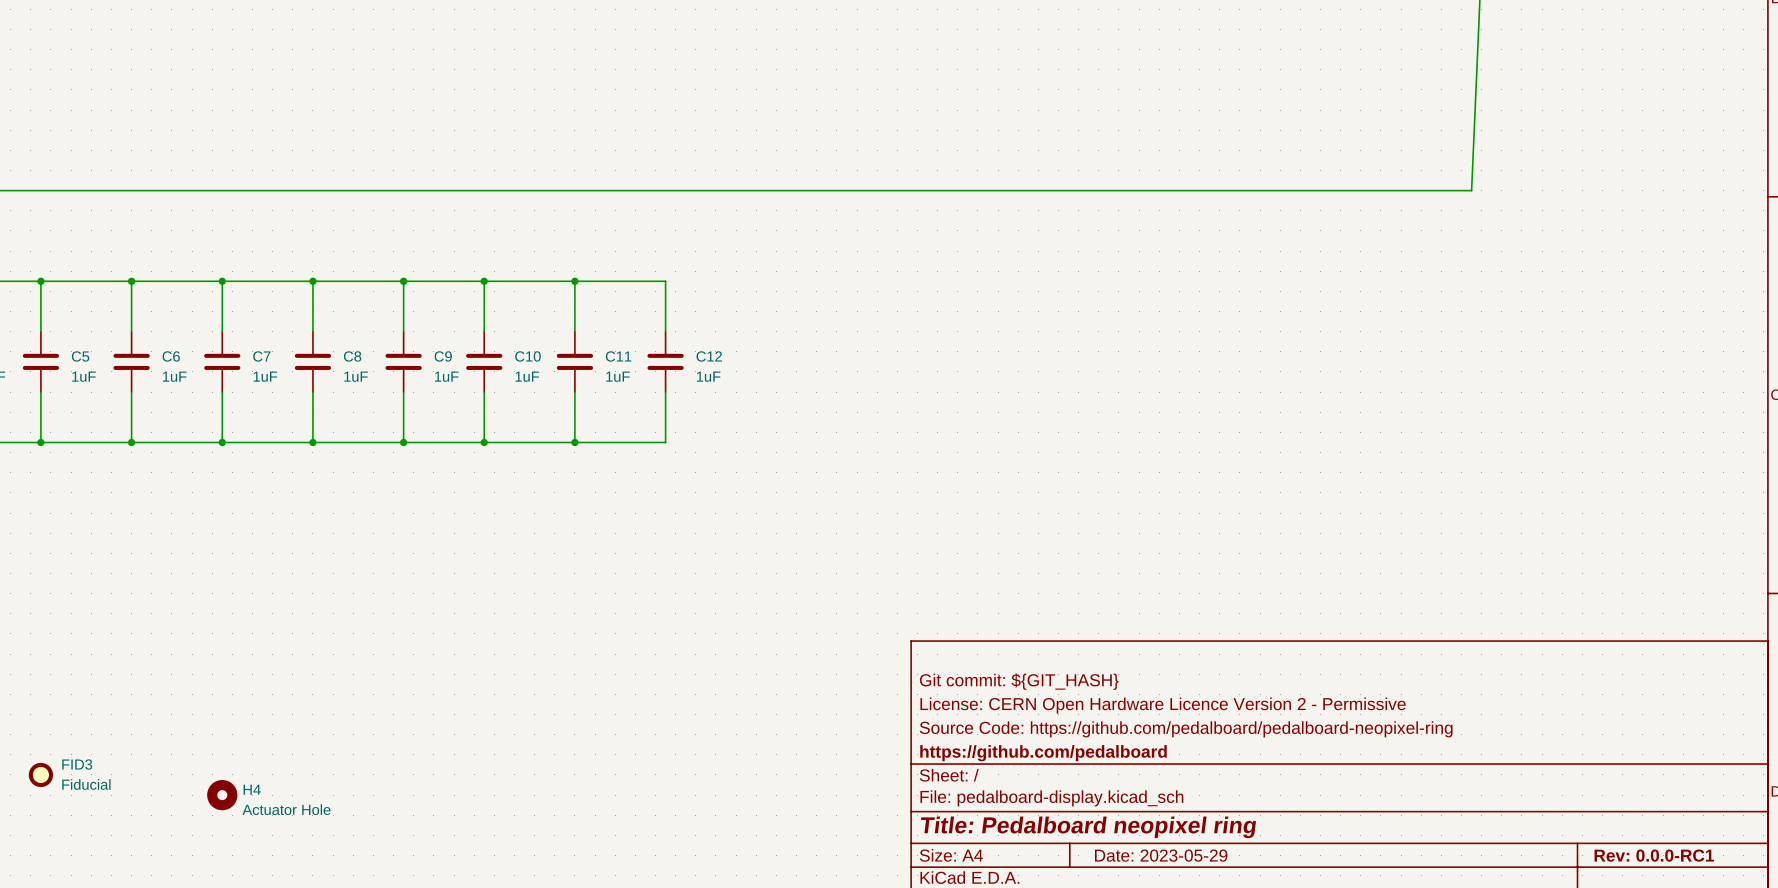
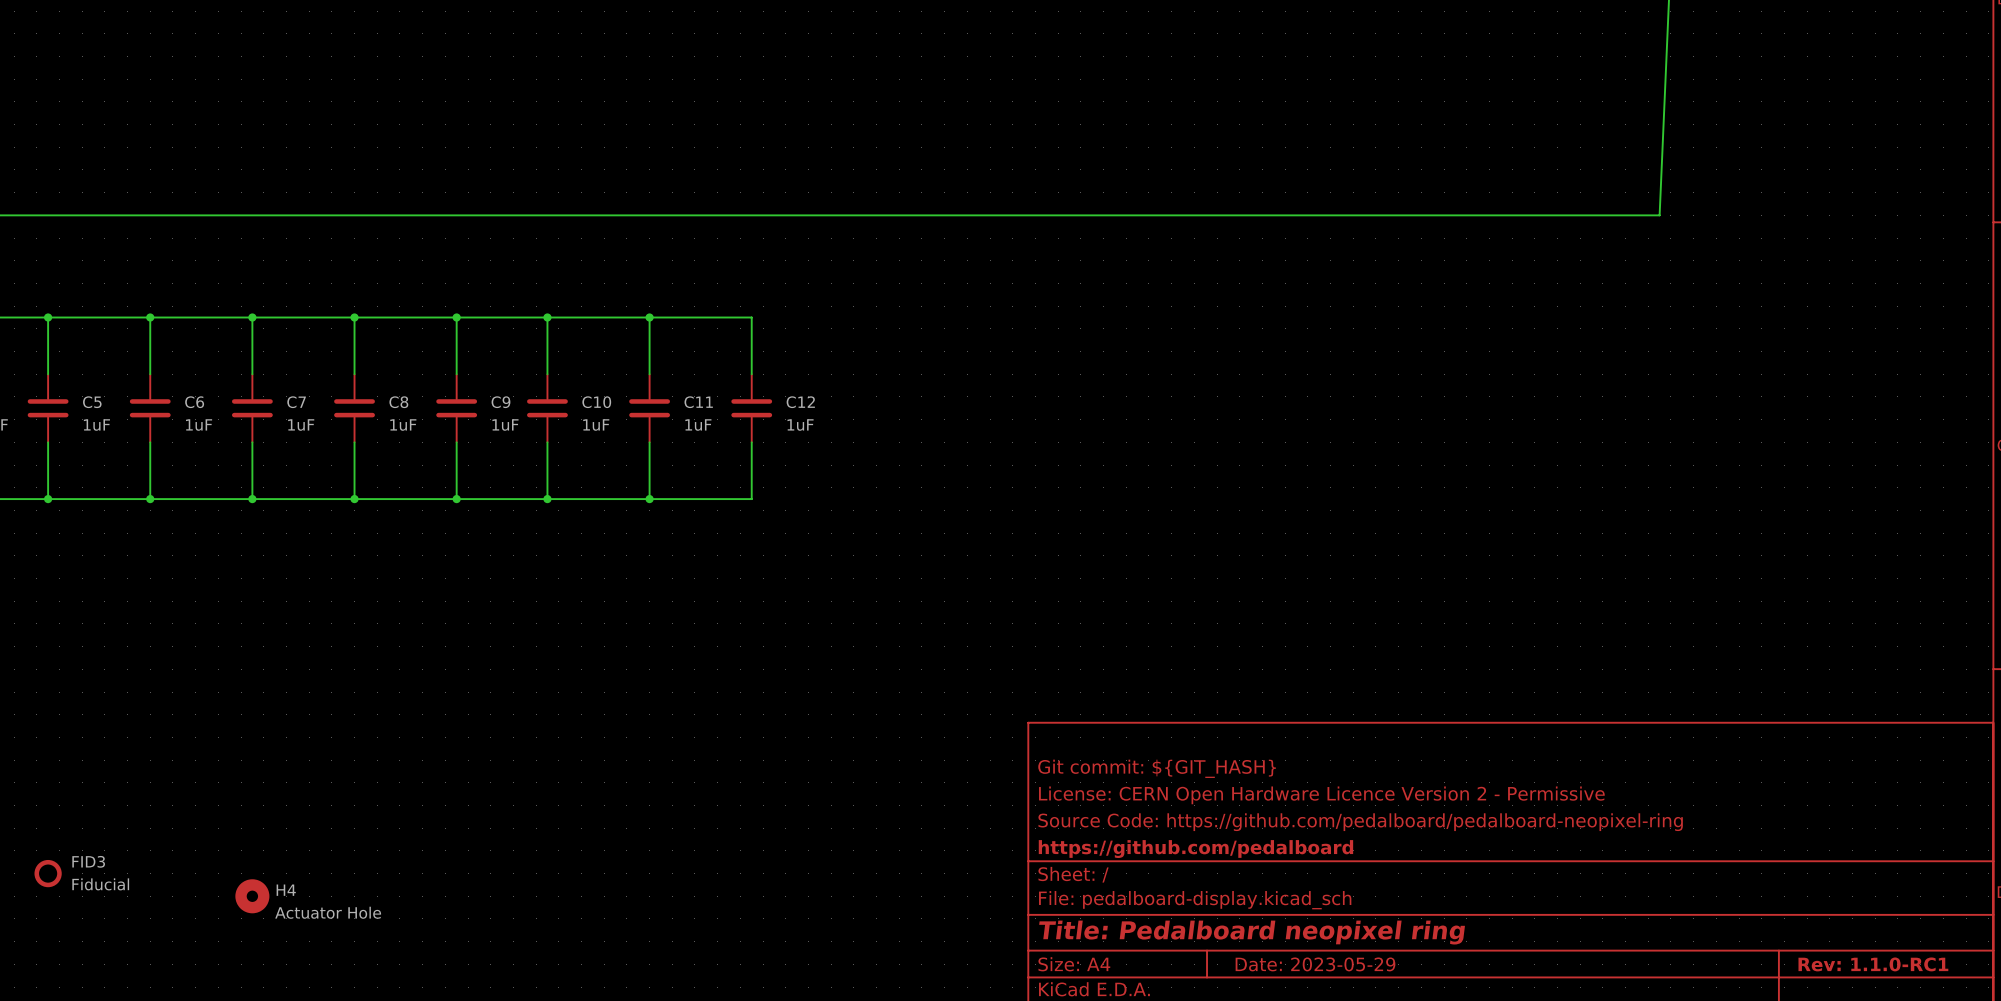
title block: Rev: 0.0.0-RC1 (1654, 855) -> Rev: 1.1.0-RC1 (1873, 964)

